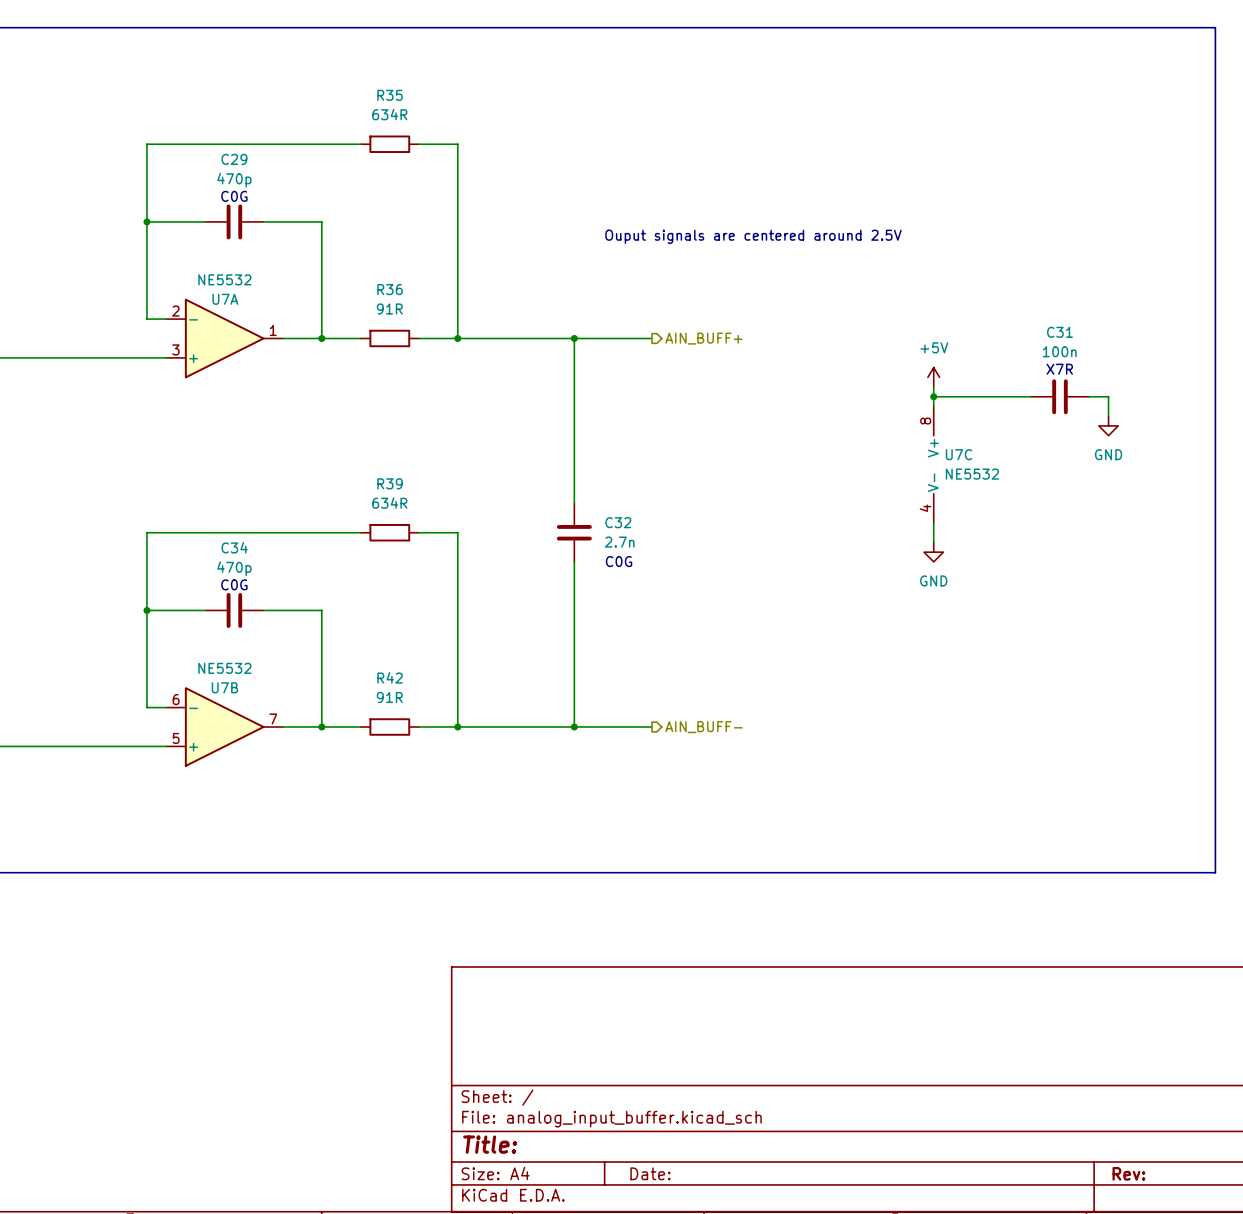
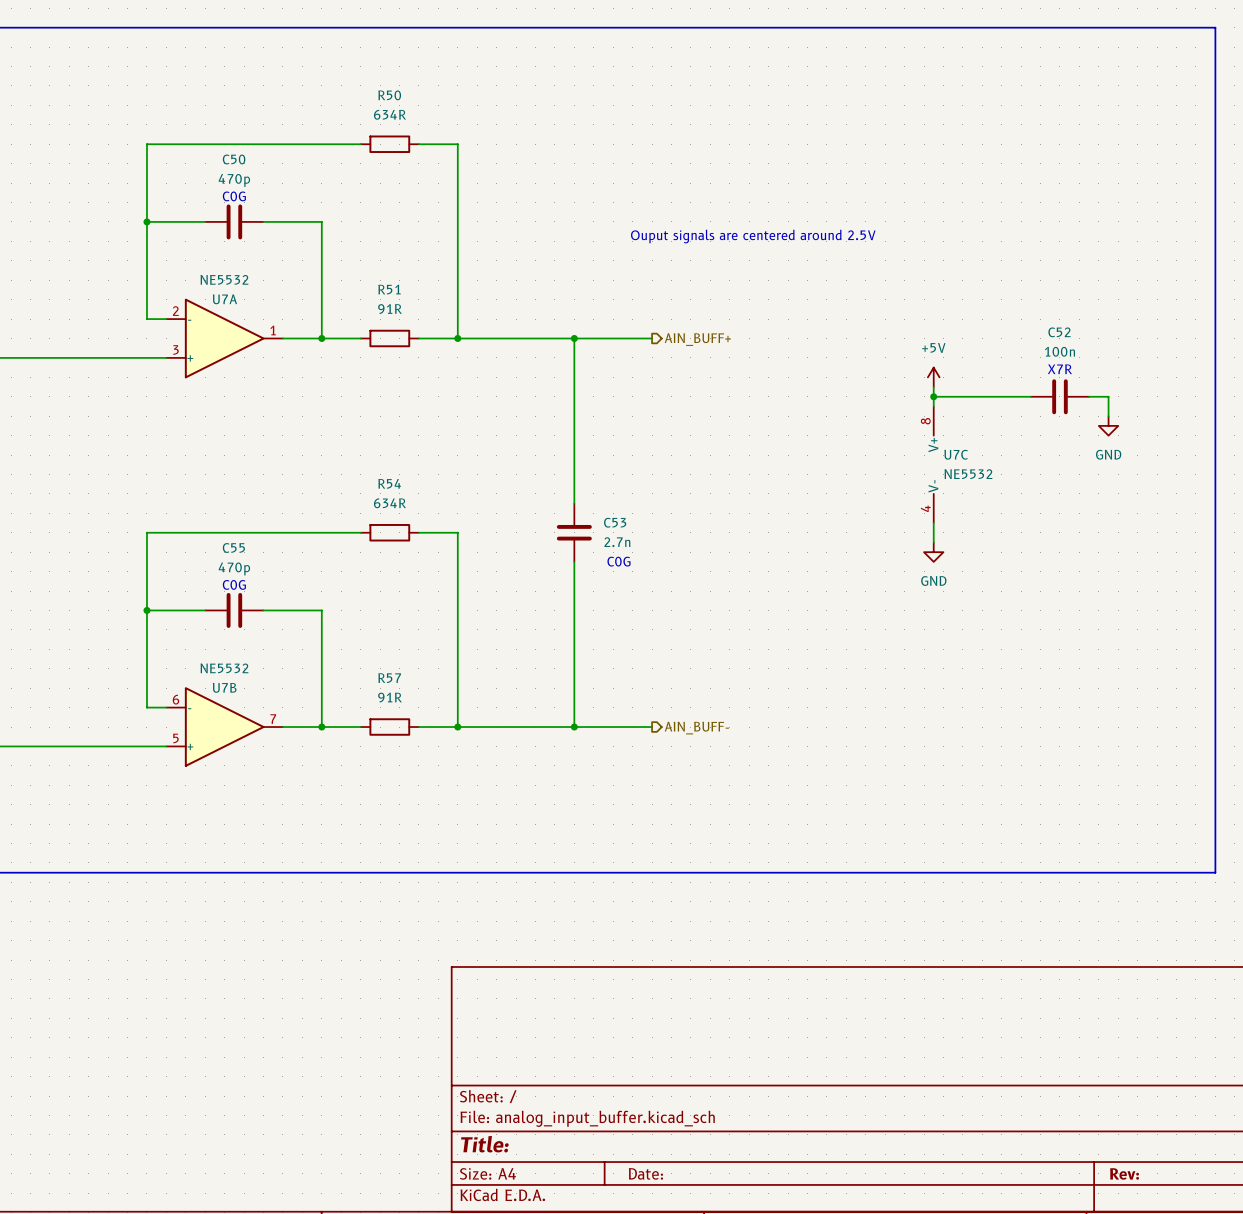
R35 name: R35 (390, 95) -> R50 (389, 95)
C29 name: C29 (234, 159) -> C50 (234, 159)
R36 name: R36 (390, 289) -> R51 (389, 289)
C31 name: C31 (1059, 332) -> C52 (1059, 332)
R39 name: R39 (390, 483) -> R54 (389, 483)
C32 name: C32 (618, 522) -> C53 (615, 522)
C34 name: C34 (234, 547) -> C55 (233, 547)
R42 name: R42 (390, 677) -> R57 (389, 678)

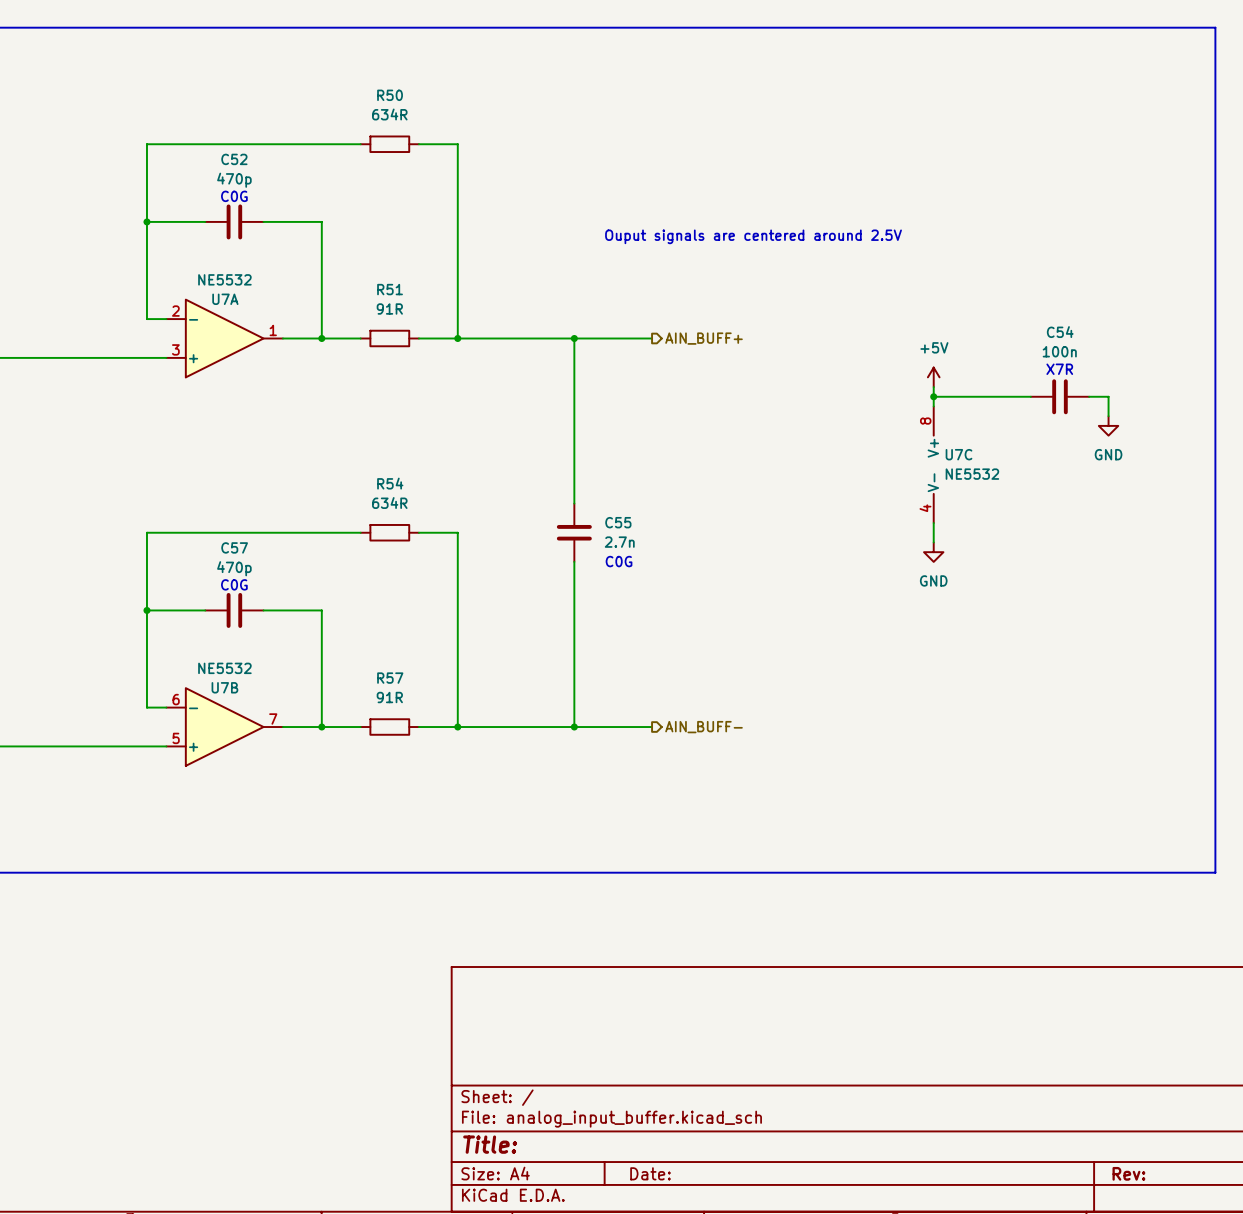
C50 name: C50 (234, 159) -> C52 (234, 159)
C52 name: C52 (1059, 332) -> C54 (1060, 332)
C53 name: C53 (615, 522) -> C55 (618, 522)
C55 name: C55 (233, 547) -> C57 (234, 547)

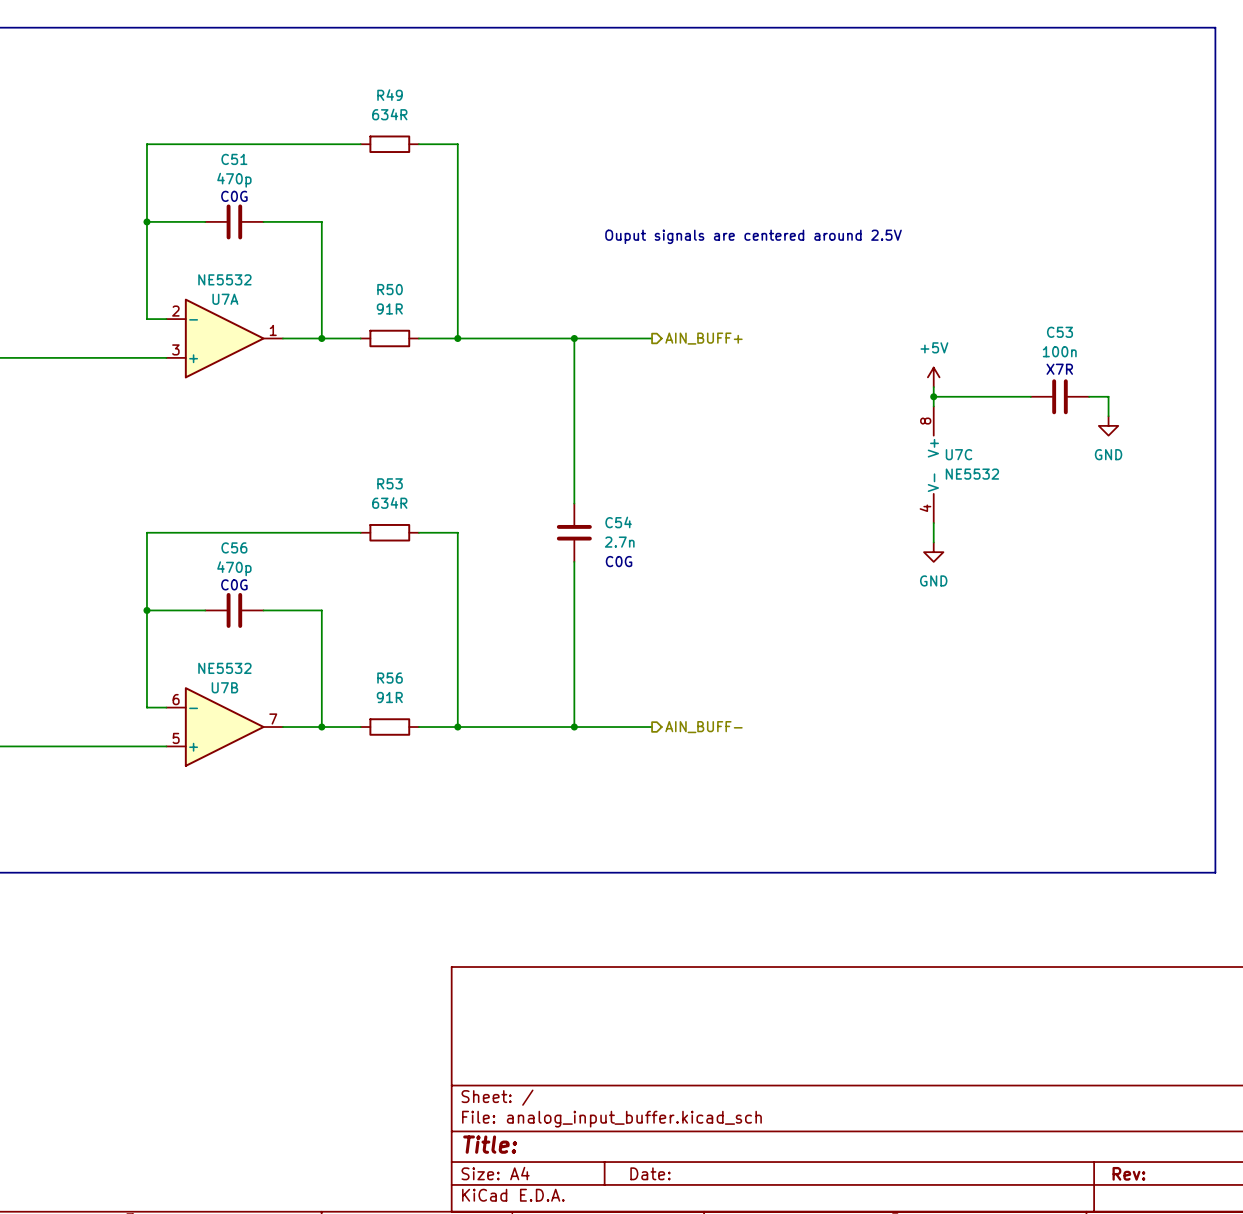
R50 name: R50 (390, 95) -> R49 (390, 95)
C52 name: C52 (234, 159) -> C51 (234, 159)
R51 name: R51 (390, 289) -> R50 (390, 289)
C54 name: C54 (1060, 332) -> C53 (1059, 332)
R54 name: R54 (390, 483) -> R53 (390, 483)
C55 name: C55 (618, 522) -> C54 (618, 522)
C57 name: C57 (234, 547) -> C56 (234, 547)
R57 name: R57 (390, 678) -> R56 (390, 678)

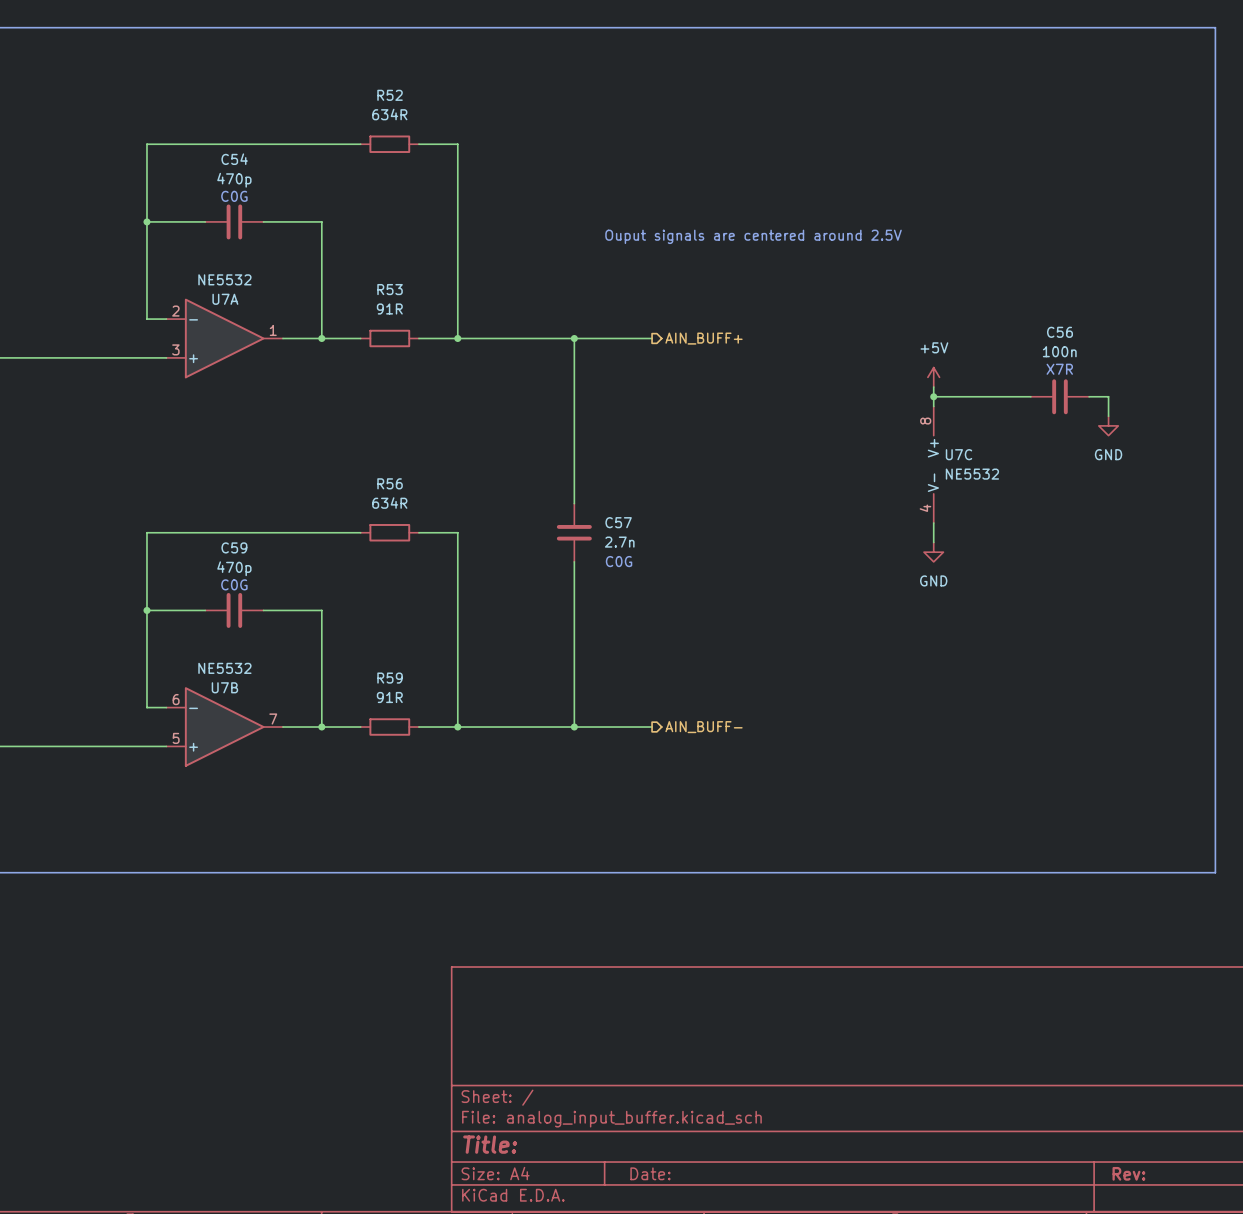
R49 name: R49 (390, 95) -> R52 (390, 95)
C51 name: C51 (234, 159) -> C54 (234, 159)
R50 name: R50 (390, 289) -> R53 (390, 289)
C53 name: C53 (1059, 332) -> C56 (1059, 332)
R53 name: R53 (390, 483) -> R56 (390, 483)
C54 name: C54 (618, 522) -> C57 (618, 522)
C56 name: C56 (234, 547) -> C59 (234, 547)
R56 name: R56 (390, 678) -> R59 (390, 678)

